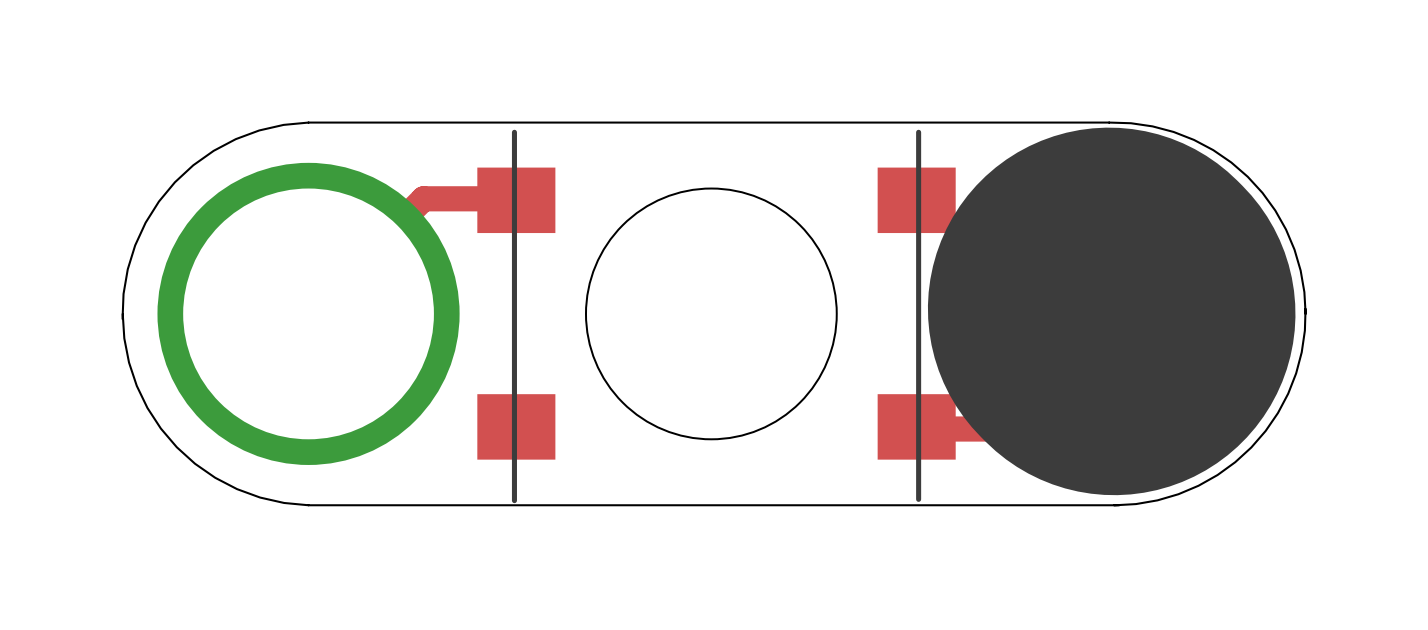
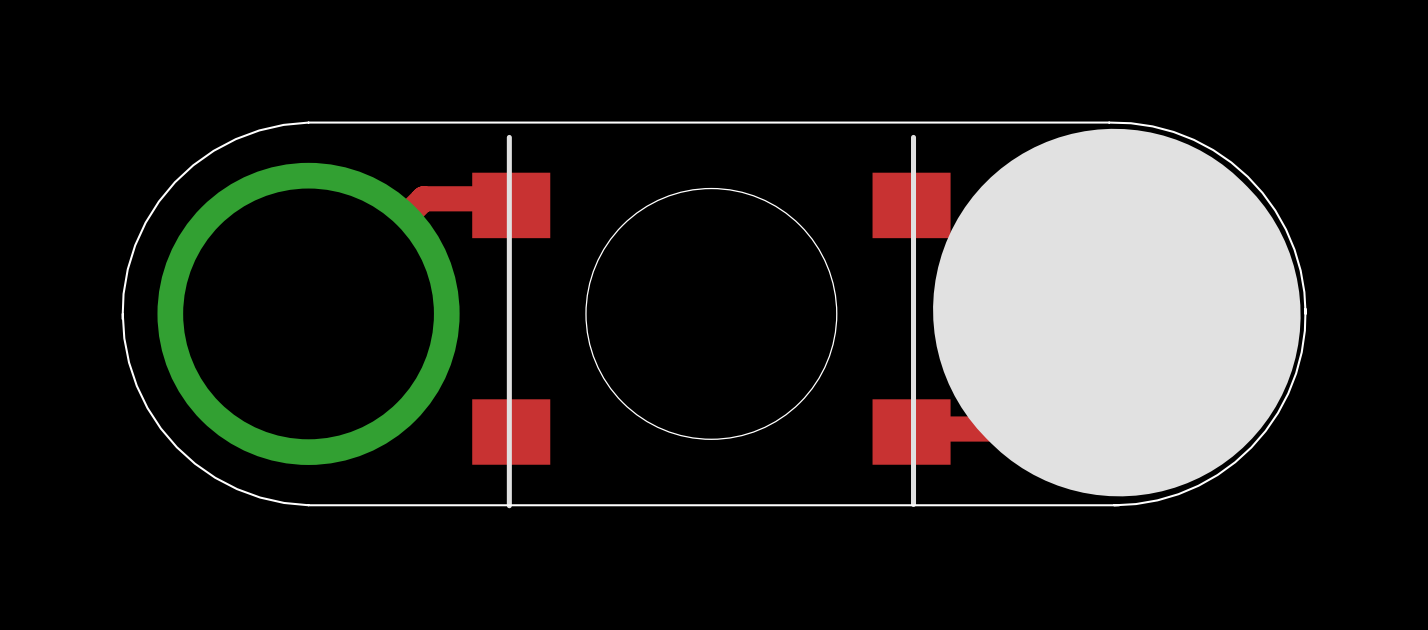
part footprint: [121, 121, 1307, 507] -> [121, 121, 1307, 509]

